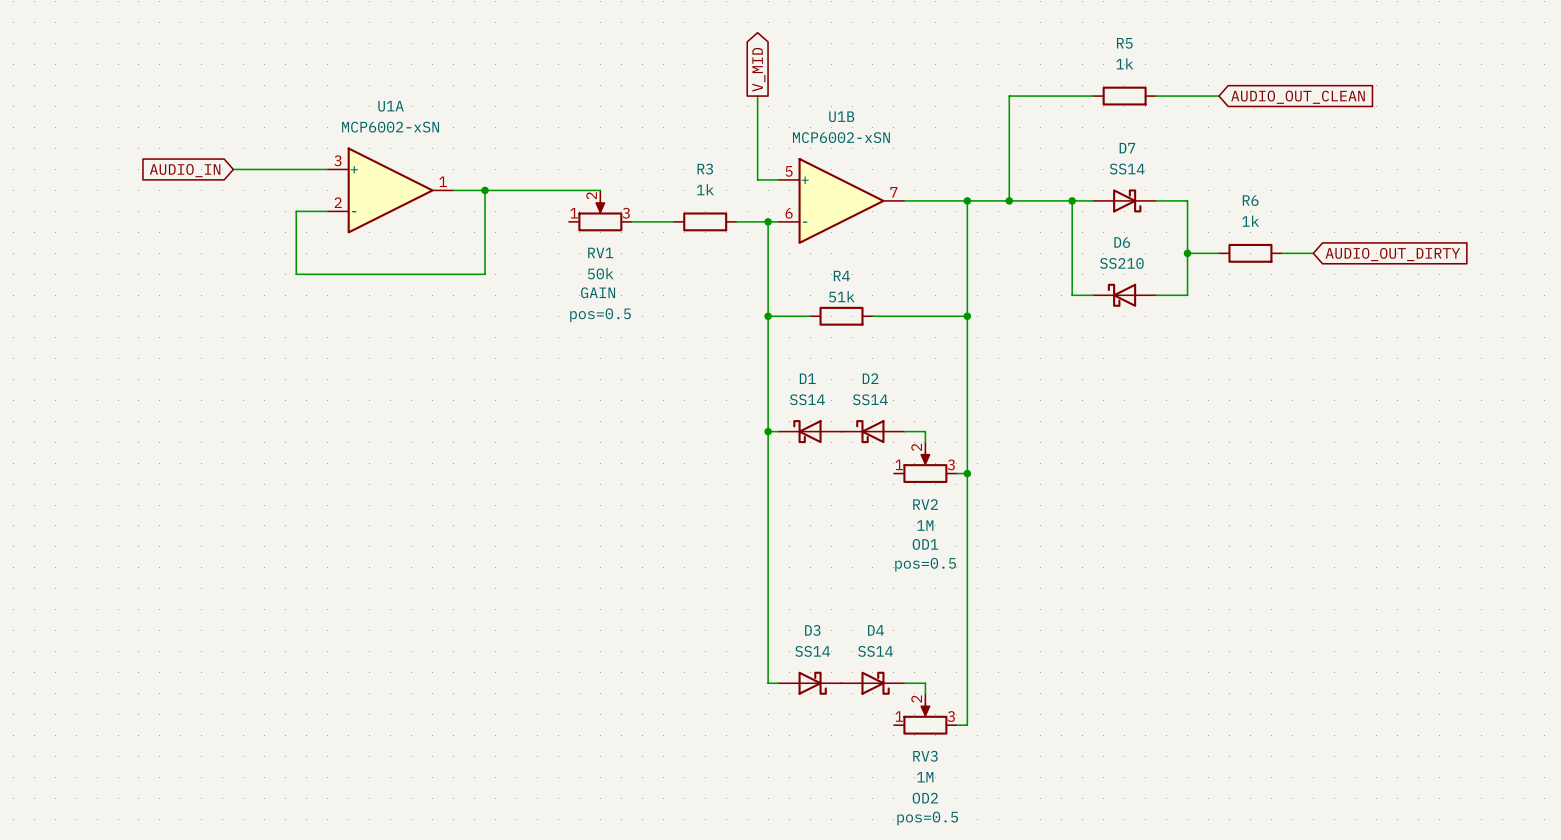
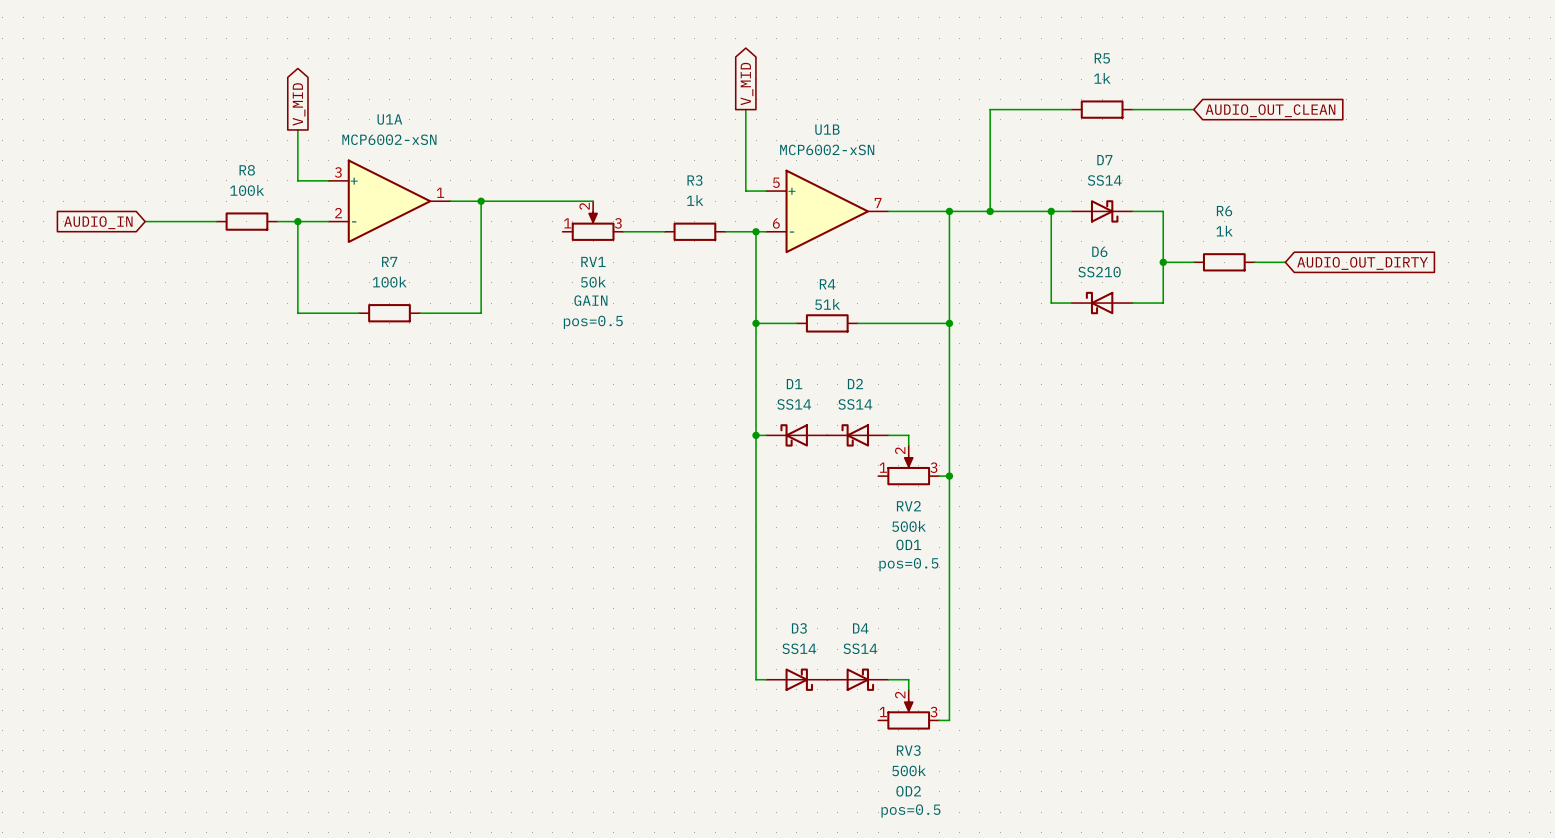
global label: none -> V_MID (299, 104)
wire: (233, 169) (296, 169) -> (297, 129) (297, 180)
global label position: AUDIO_IN (185, 170) -> AUDIO_IN (98, 222)
wire: none -> (145, 221) (216, 221)
R8: none -> 100k (246, 221)
wire: none -> (277, 221) (297, 221)
junction: none -> (297, 221)
wire: (296, 274) (485, 274) -> (420, 313) (481, 313) (481, 282)
wire: none -> (297, 282) (297, 313) (358, 313)
R7: none -> 100k (389, 313)
RV2 value: 1M (925, 525) -> 500k (909, 526)
RV3 value: 1M (925, 777) -> 500k (909, 770)

